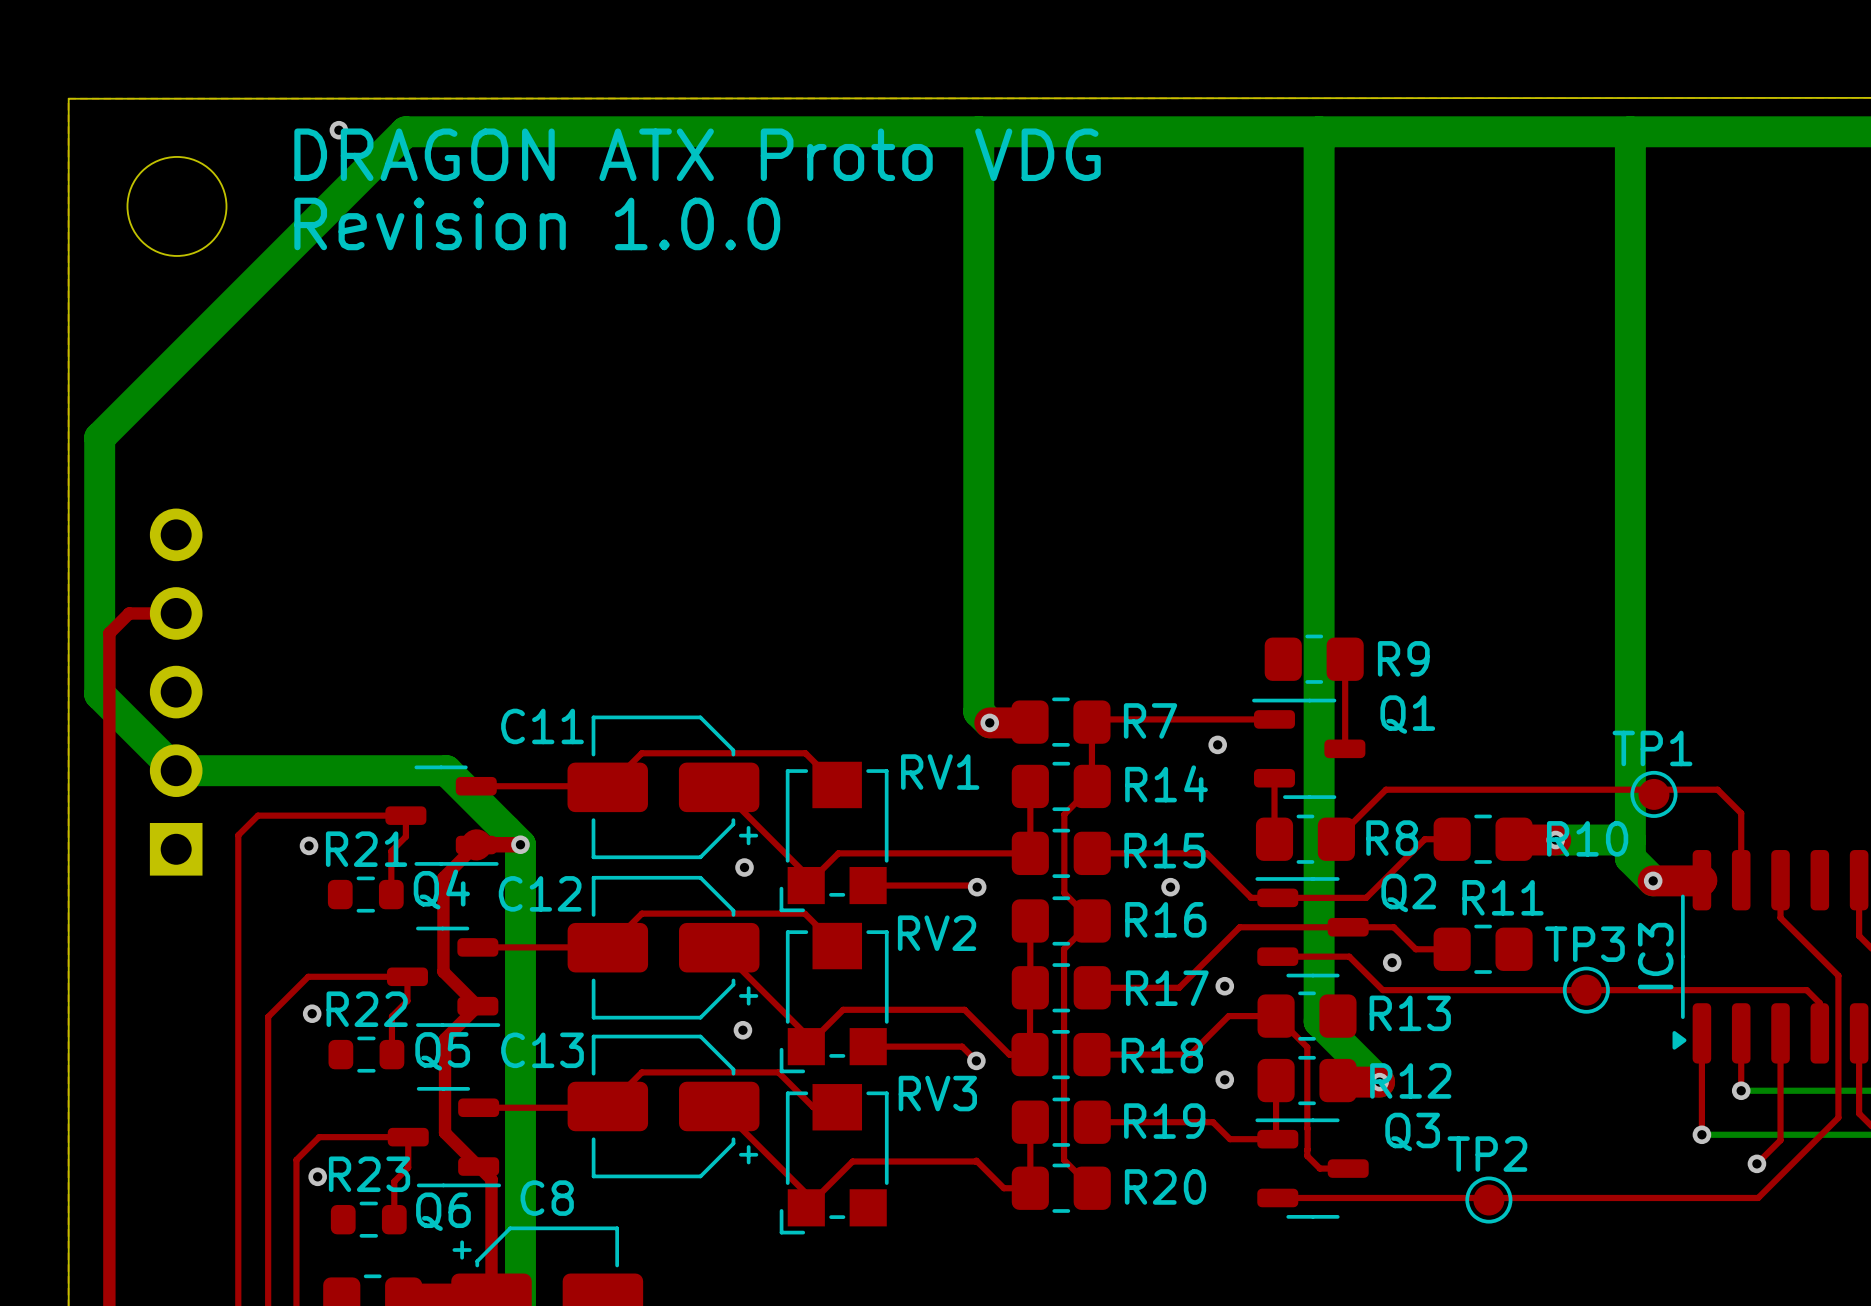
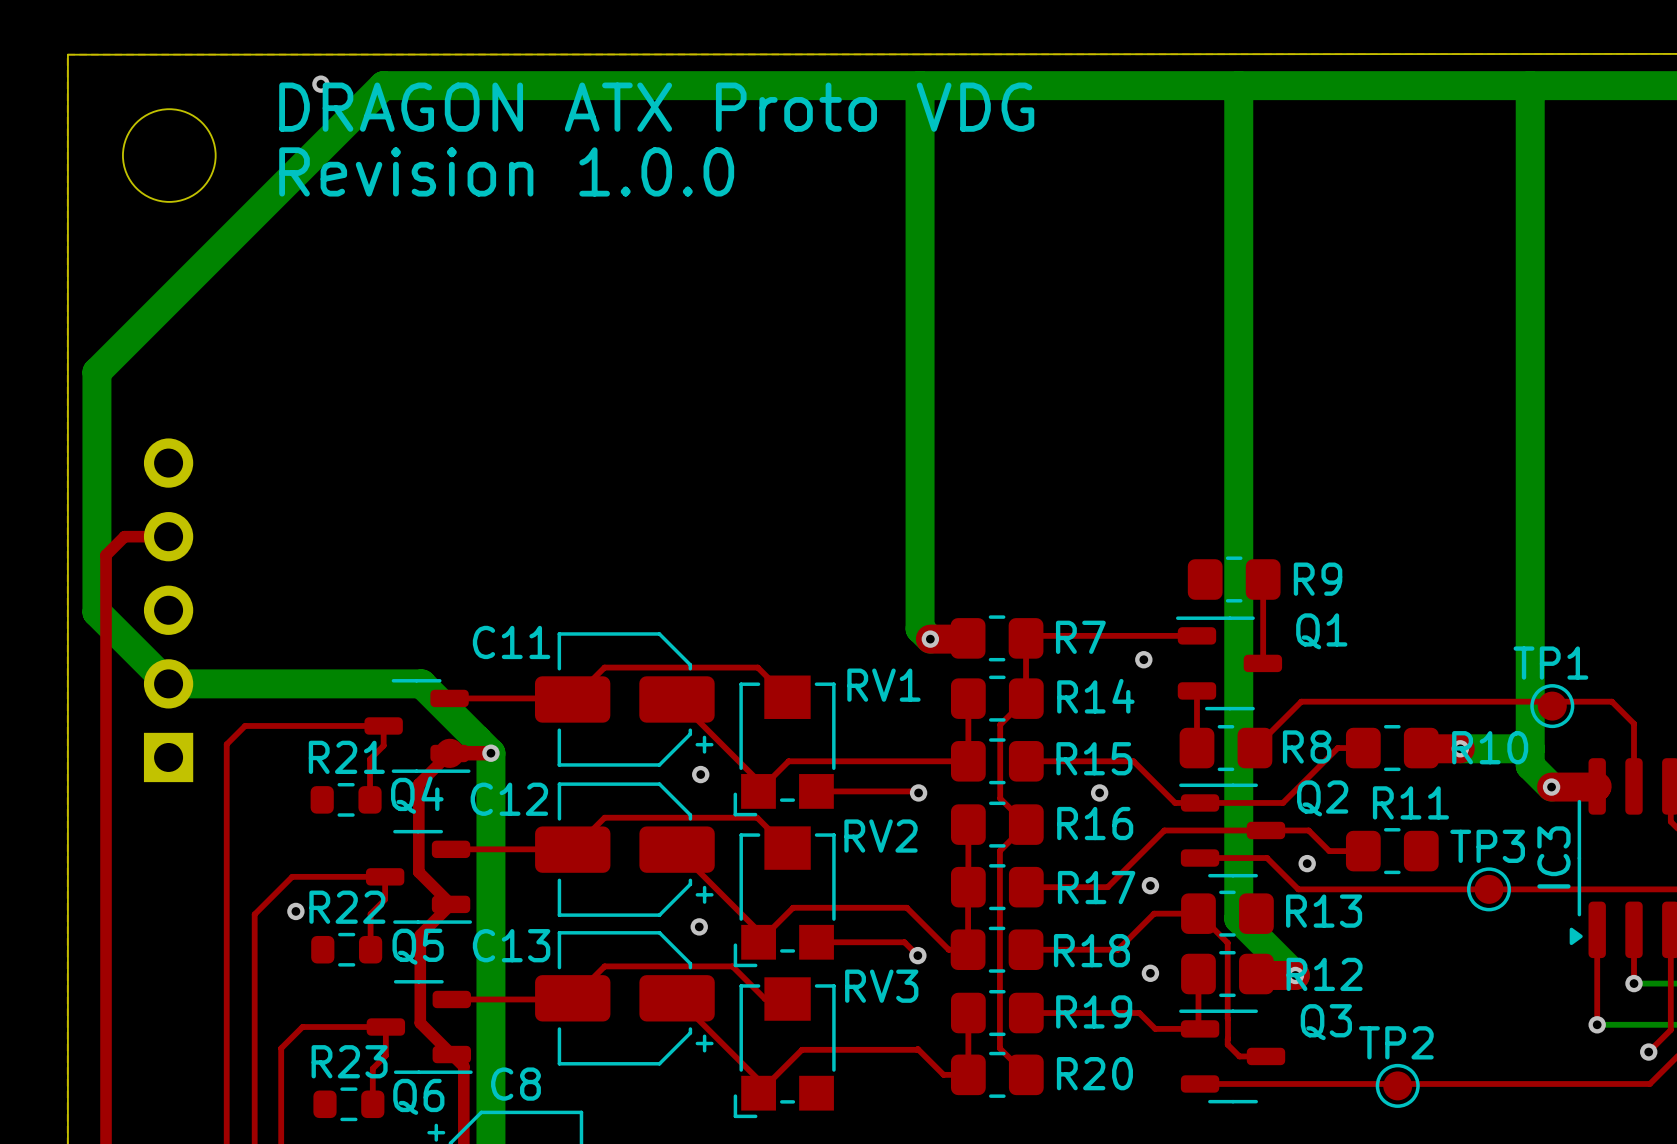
via: (309, 845) -> none
via: (317, 1176) -> none

